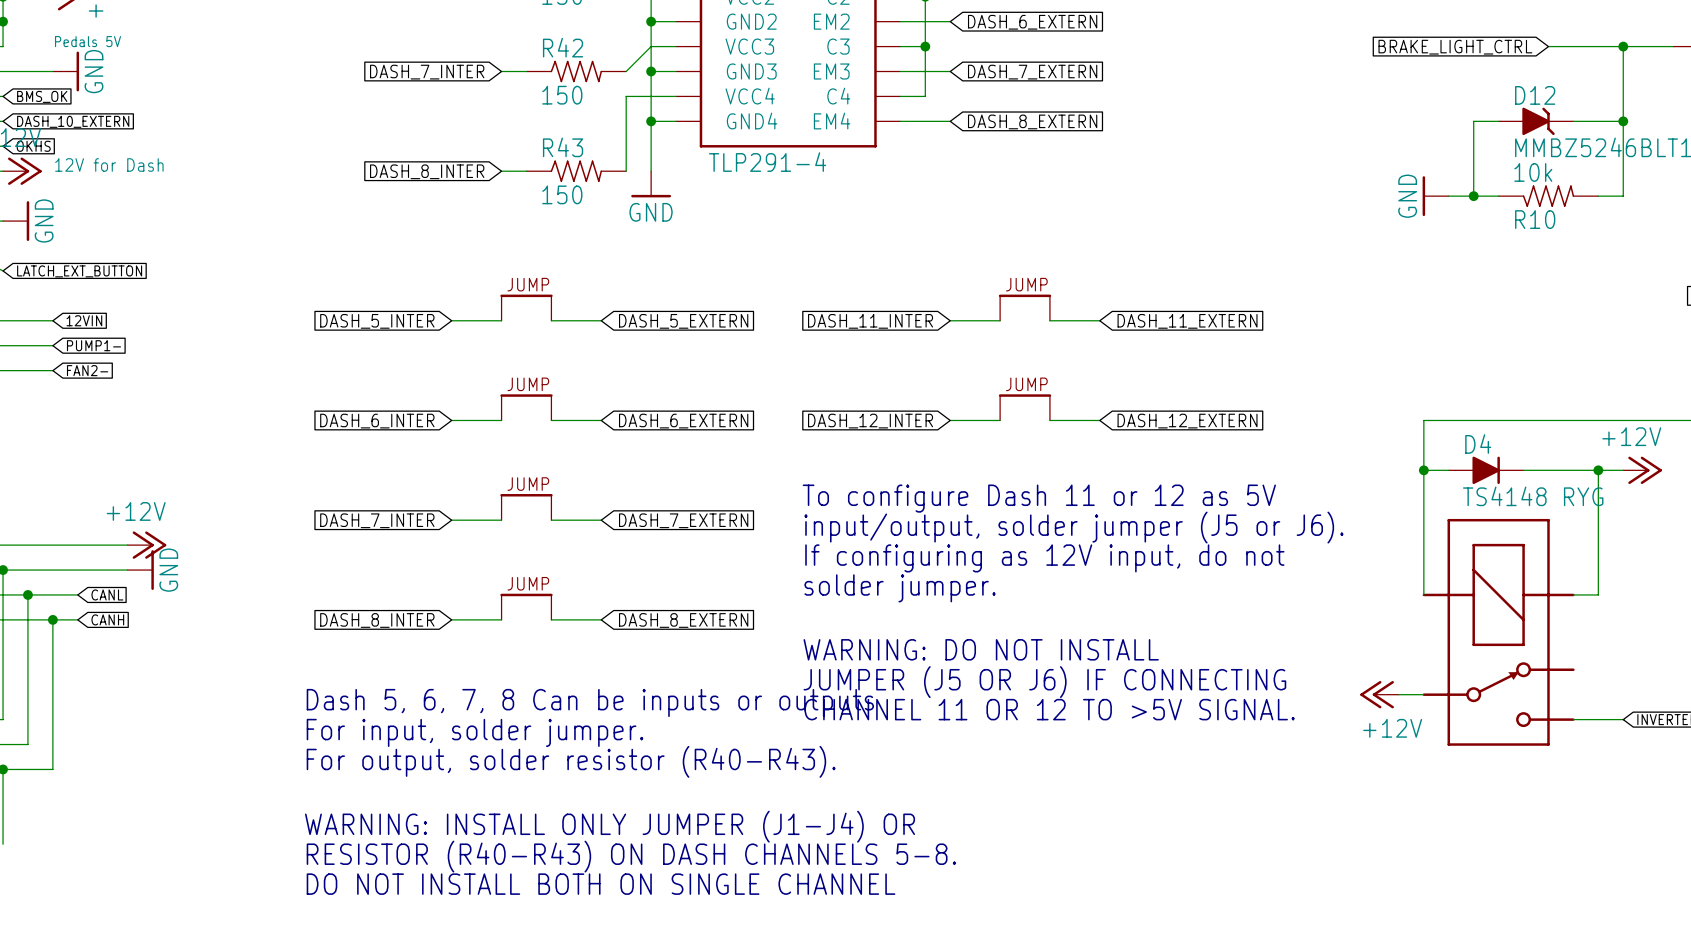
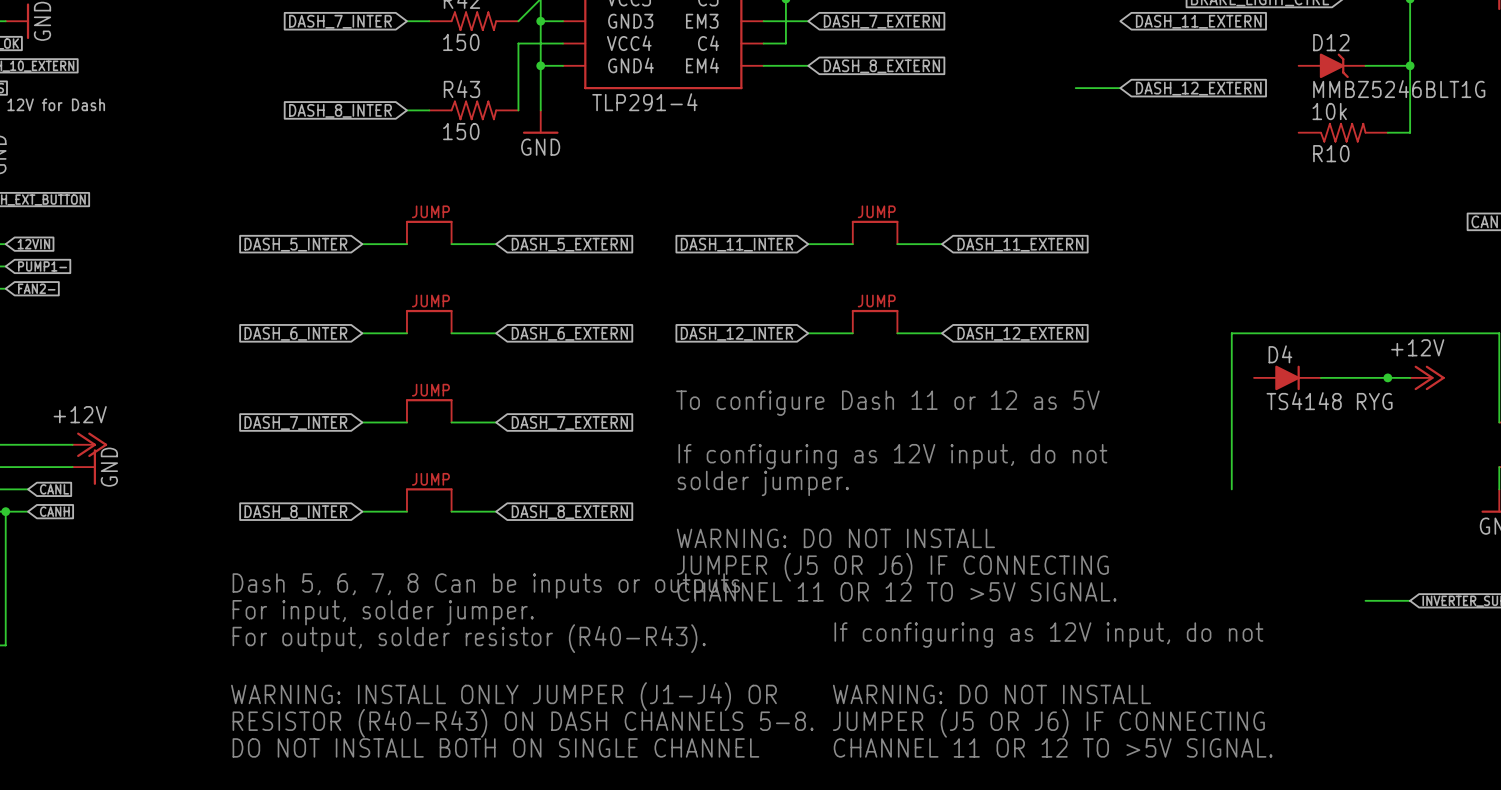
global label: none -> DASH_11_EXTERN (1198, 21)
wire: (1498, 121) (1473, 121) (1473, 196) -> none
global label: none -> DASH_12_EXTERN (1198, 88)
power symbol: GND (1435, 196) -> none
wire: (1448, 196) (1498, 196) -> (1075, 88) (1120, 88)
junction: (1473, 196) -> none
wire: (1423, 470) (1448, 470) -> none
junction: (1423, 470) -> none
wire: (1598, 470) (1598, 594) (1573, 594) -> none
text: input/output, solder jumper (J5 or J6). (1073, 527) -> none
part: (1498, 632) -> none
power symbol: +12V (1379, 694) -> none
wire: (1398, 694) (1423, 694) -> none
text: none -> If configuring as 12V input, do not (1048, 635)
text: none -> WARNING: DO NOT INSTALL (991, 694)
text: none -> JUMPER (J5 OR J6) IF CONNECTING (1048, 723)
text: none -> CHANNEL 11 OR 12 TO >5V SIGNAL. (1053, 747)

